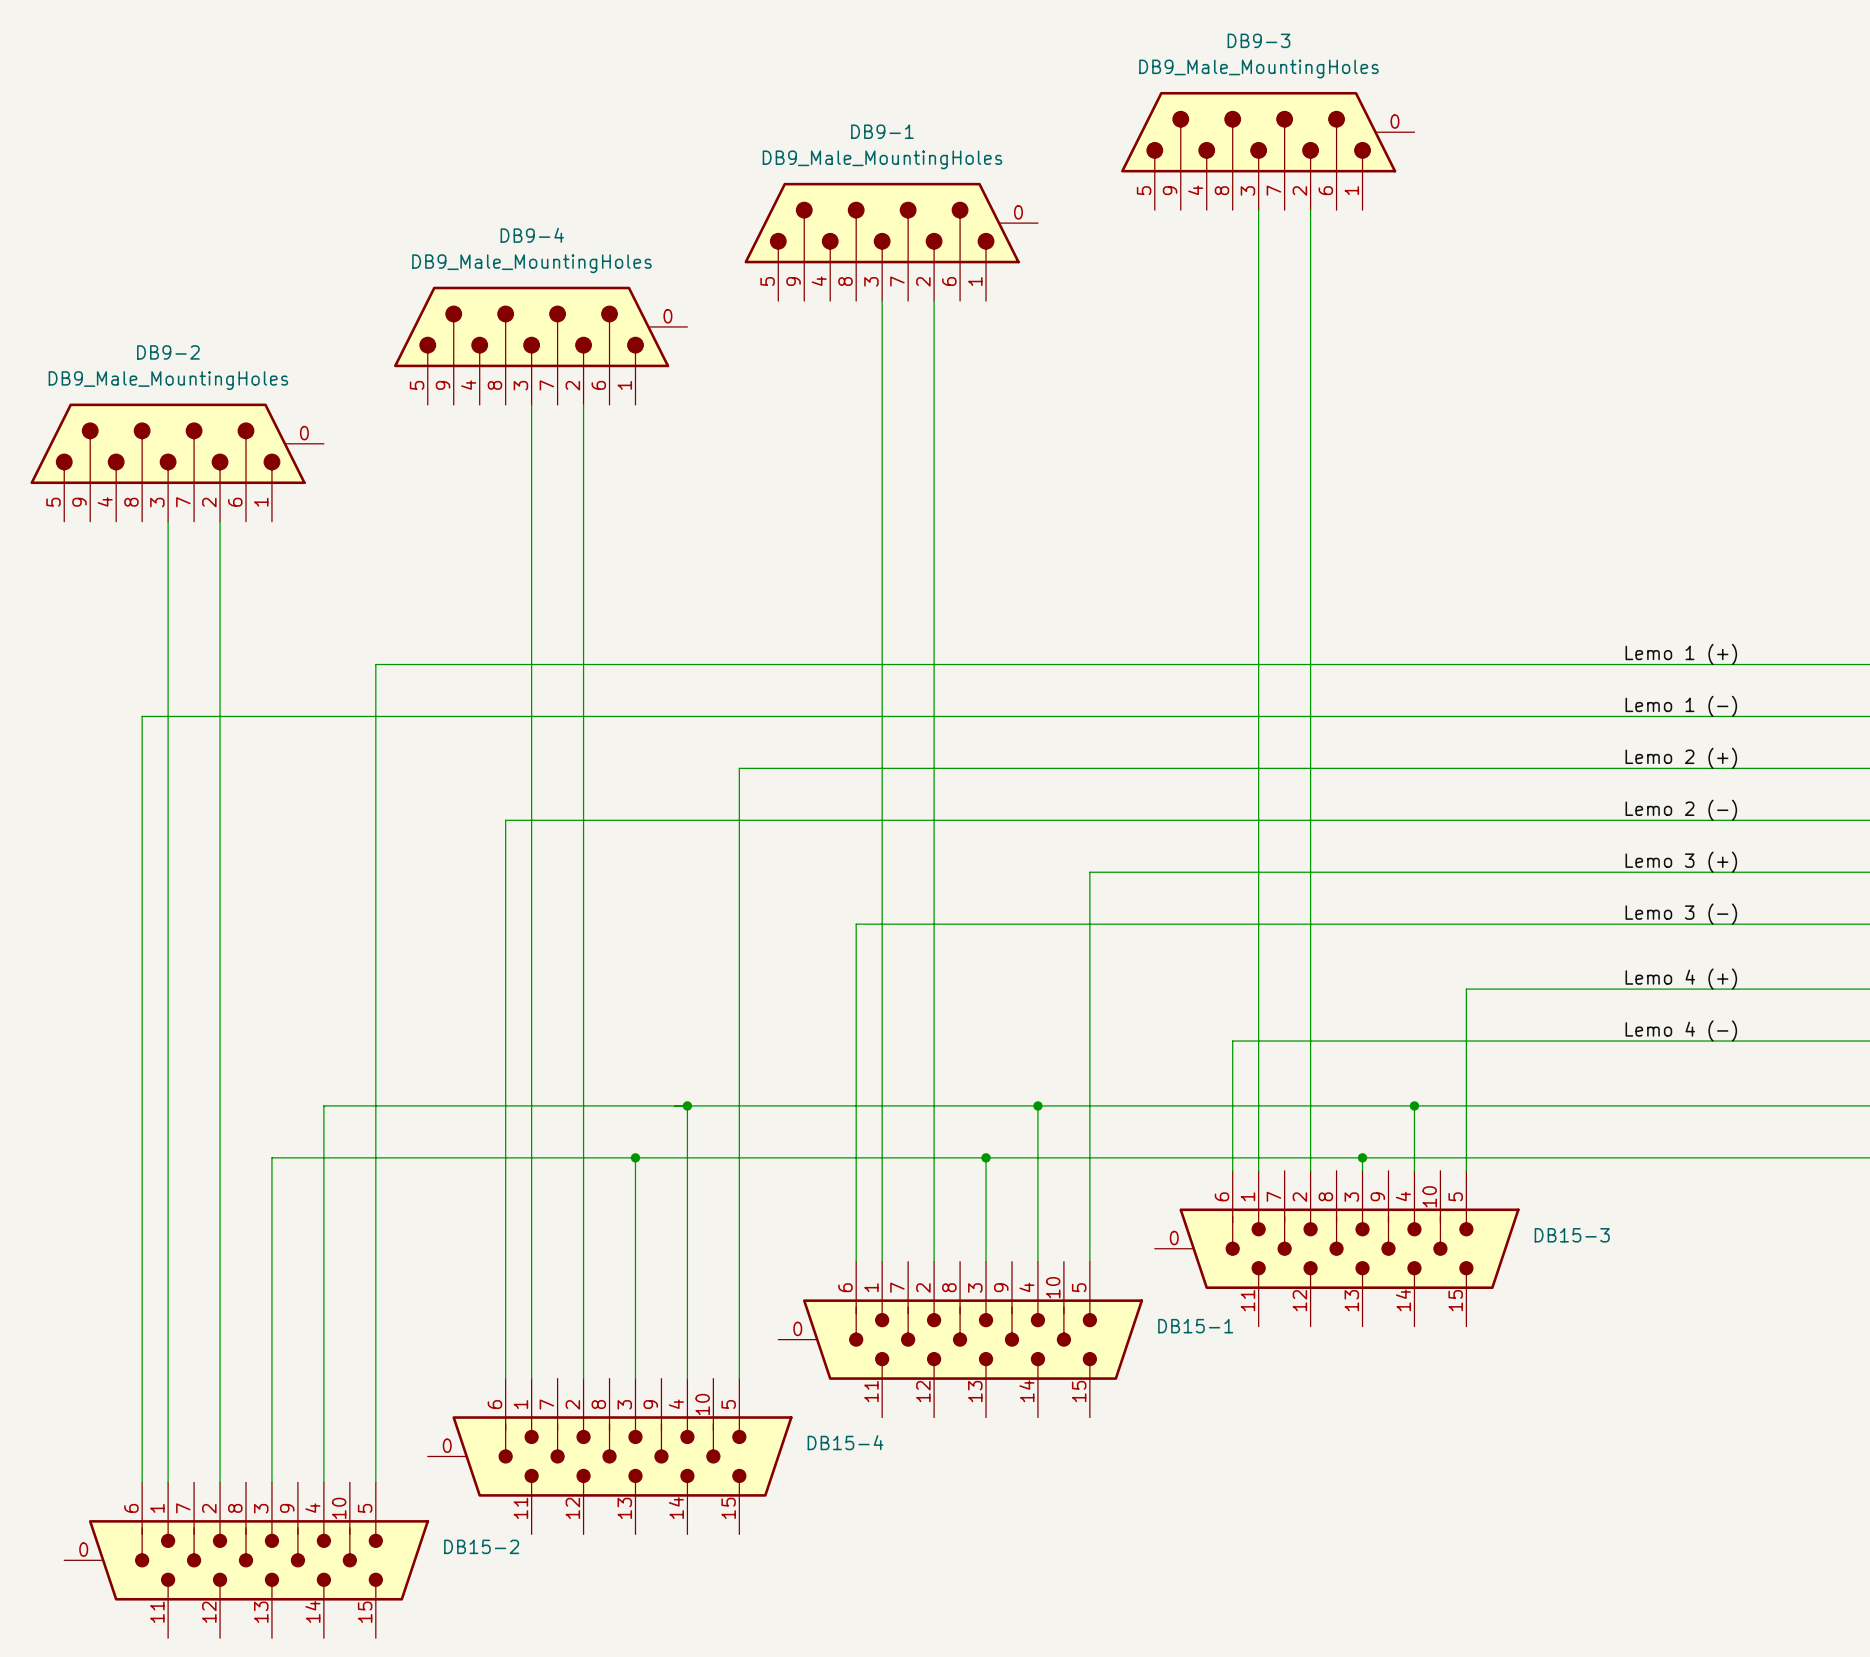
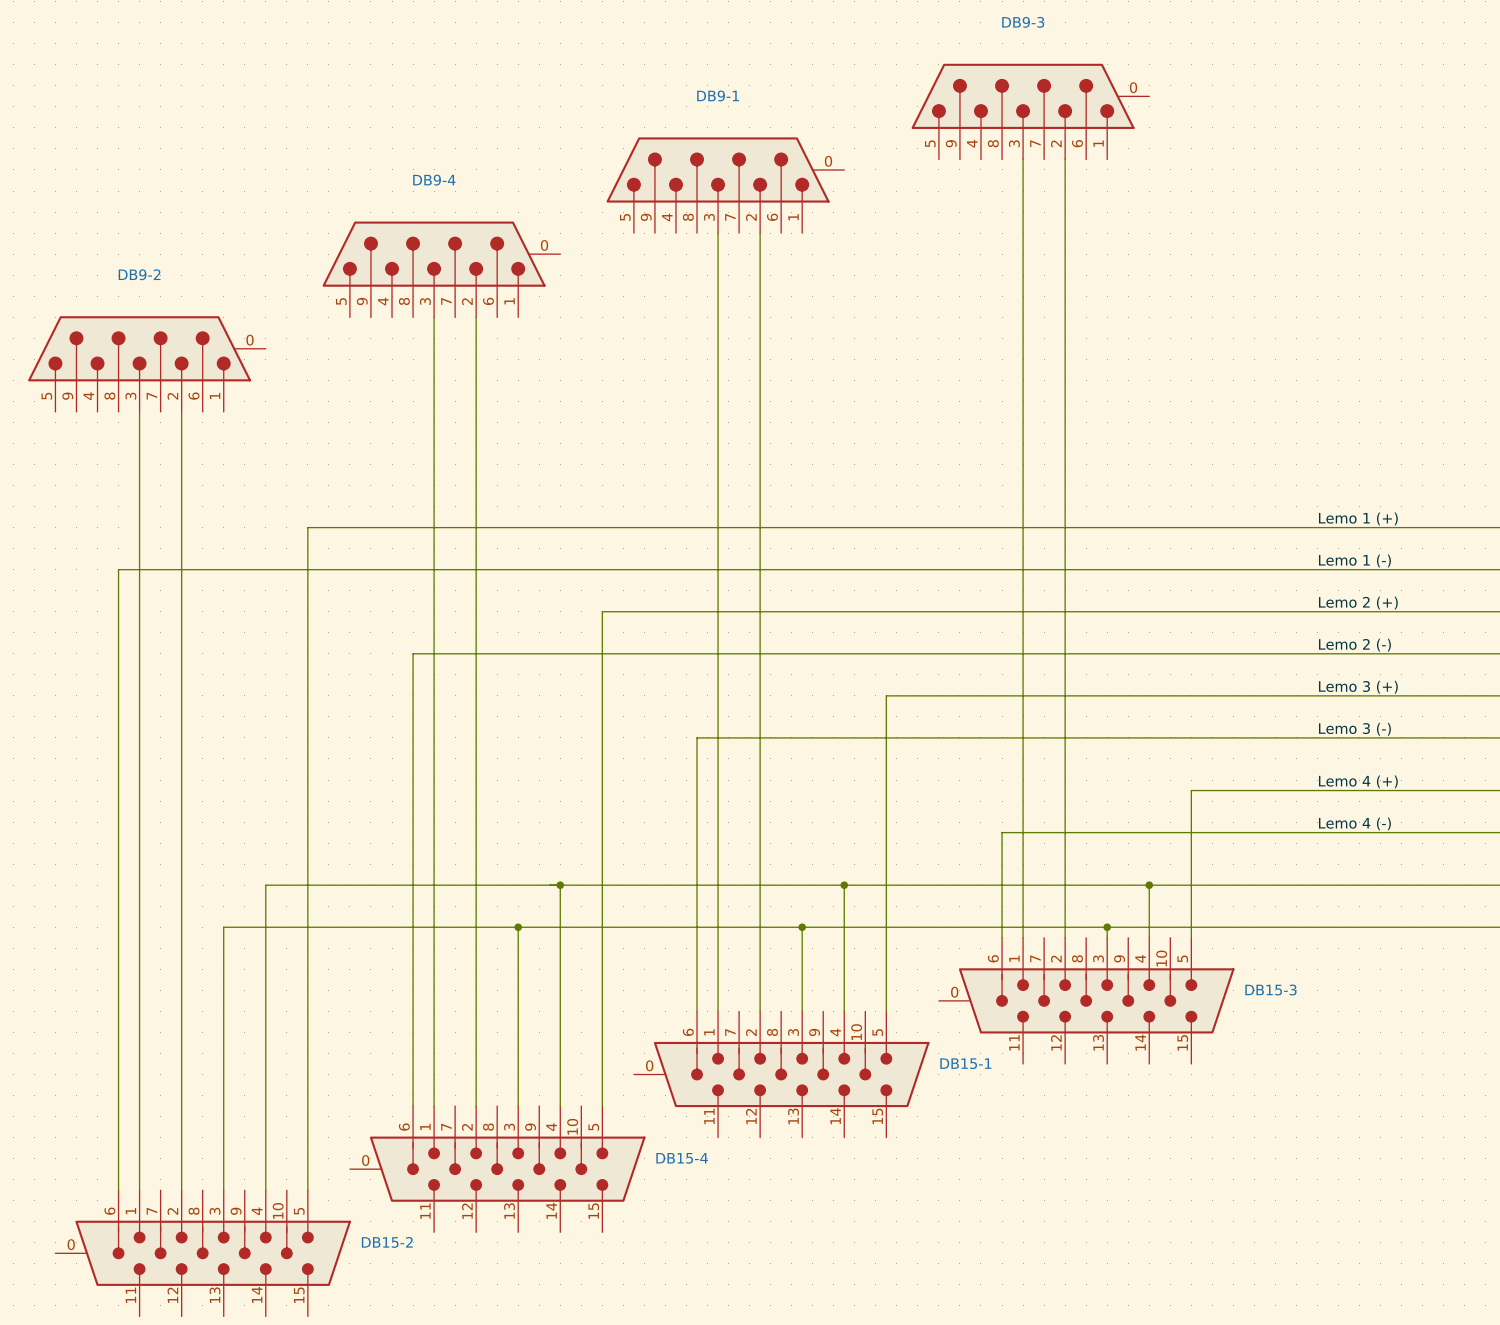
DB9-3 value: DB9_Male_MountingHoles (1258, 68) -> none
DB9-1 value: DB9_Male_MountingHoles (882, 159) -> none
DB9-4 value: DB9_Male_MountingHoles (531, 263) -> none
DB9-2 value: DB9_Male_MountingHoles (168, 380) -> none

